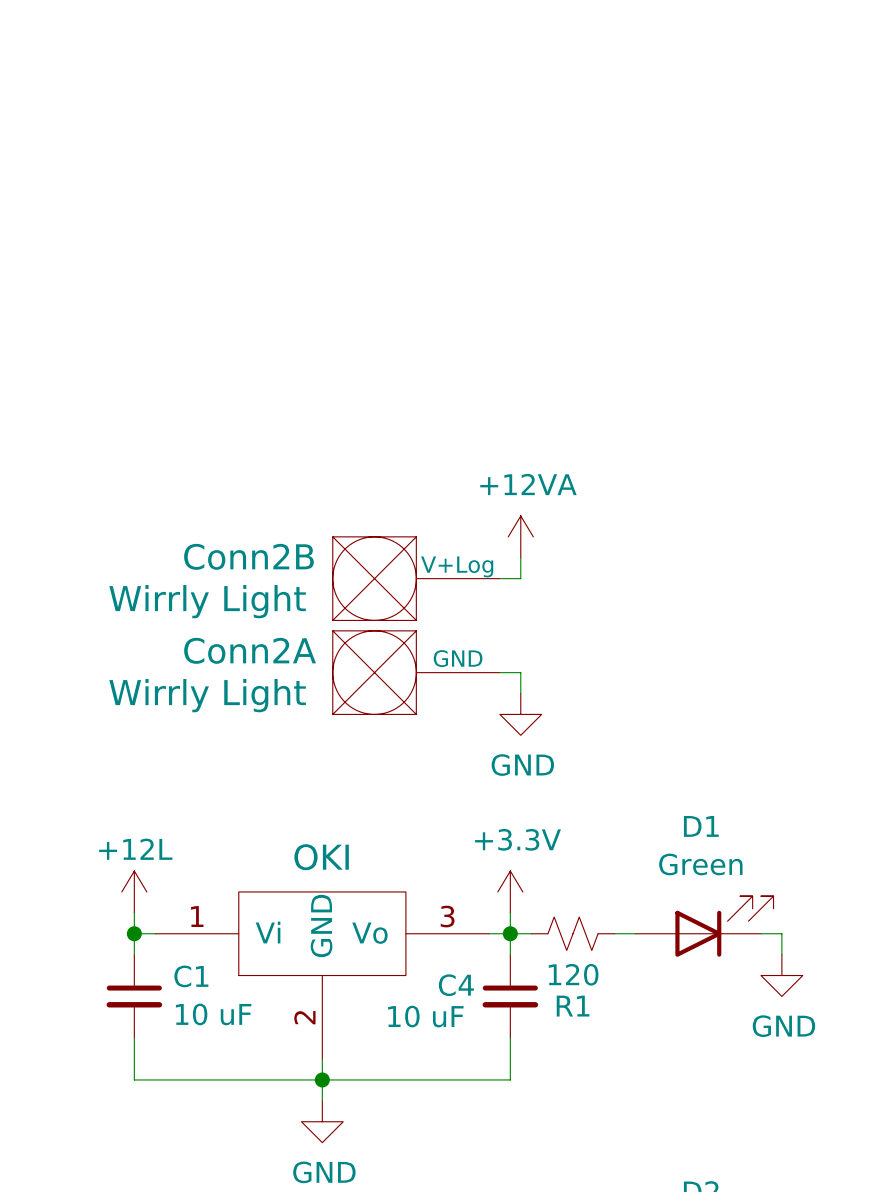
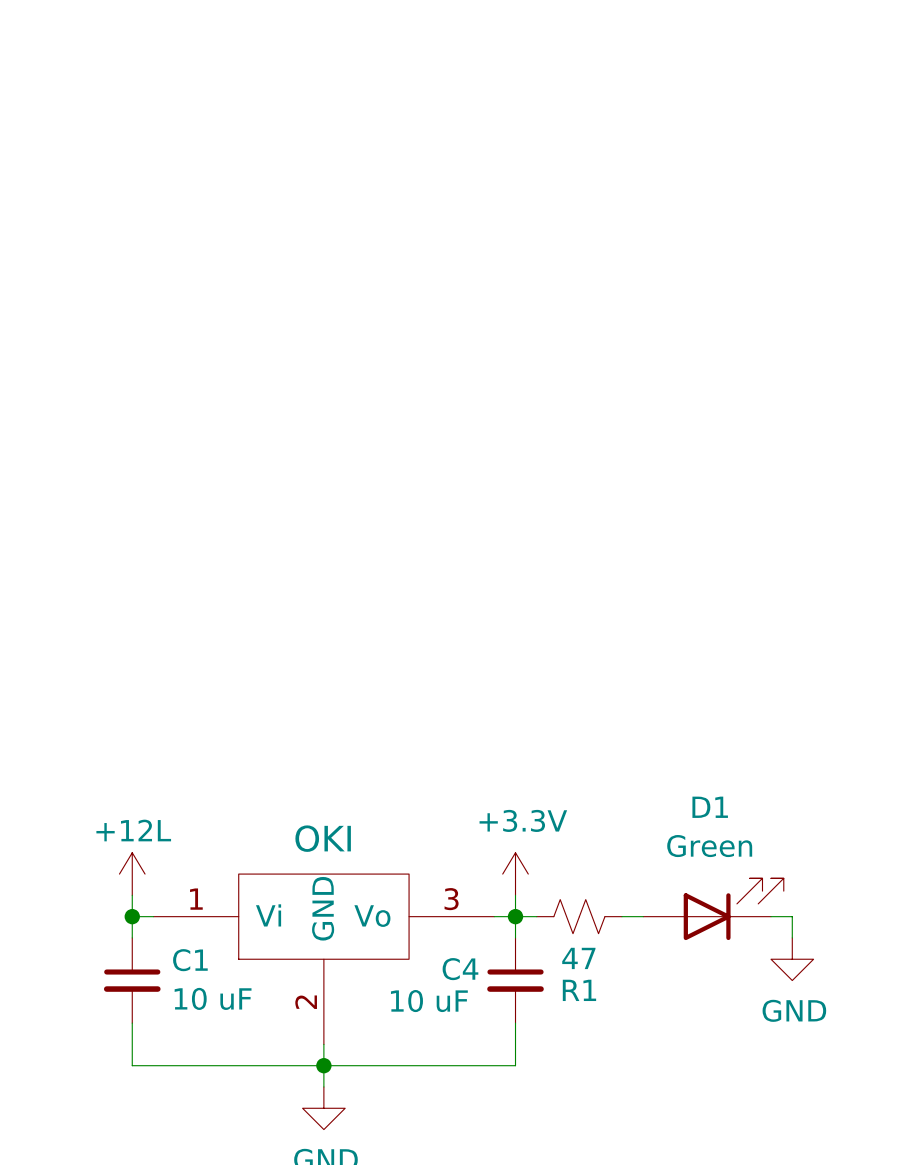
power symbol: +12VA (520, 536) -> none
wire: (520, 557) (520, 578) (499, 578) -> none
Conn2B: Wirrly Light (416, 578) -> none
Conn2A: Wirrly Light (416, 672) -> none
wire: (499, 672) (520, 672) (520, 693) -> none
power symbol: GND (520, 714) -> none
R1 value: 120 (573, 974) -> 47 (578, 958)

